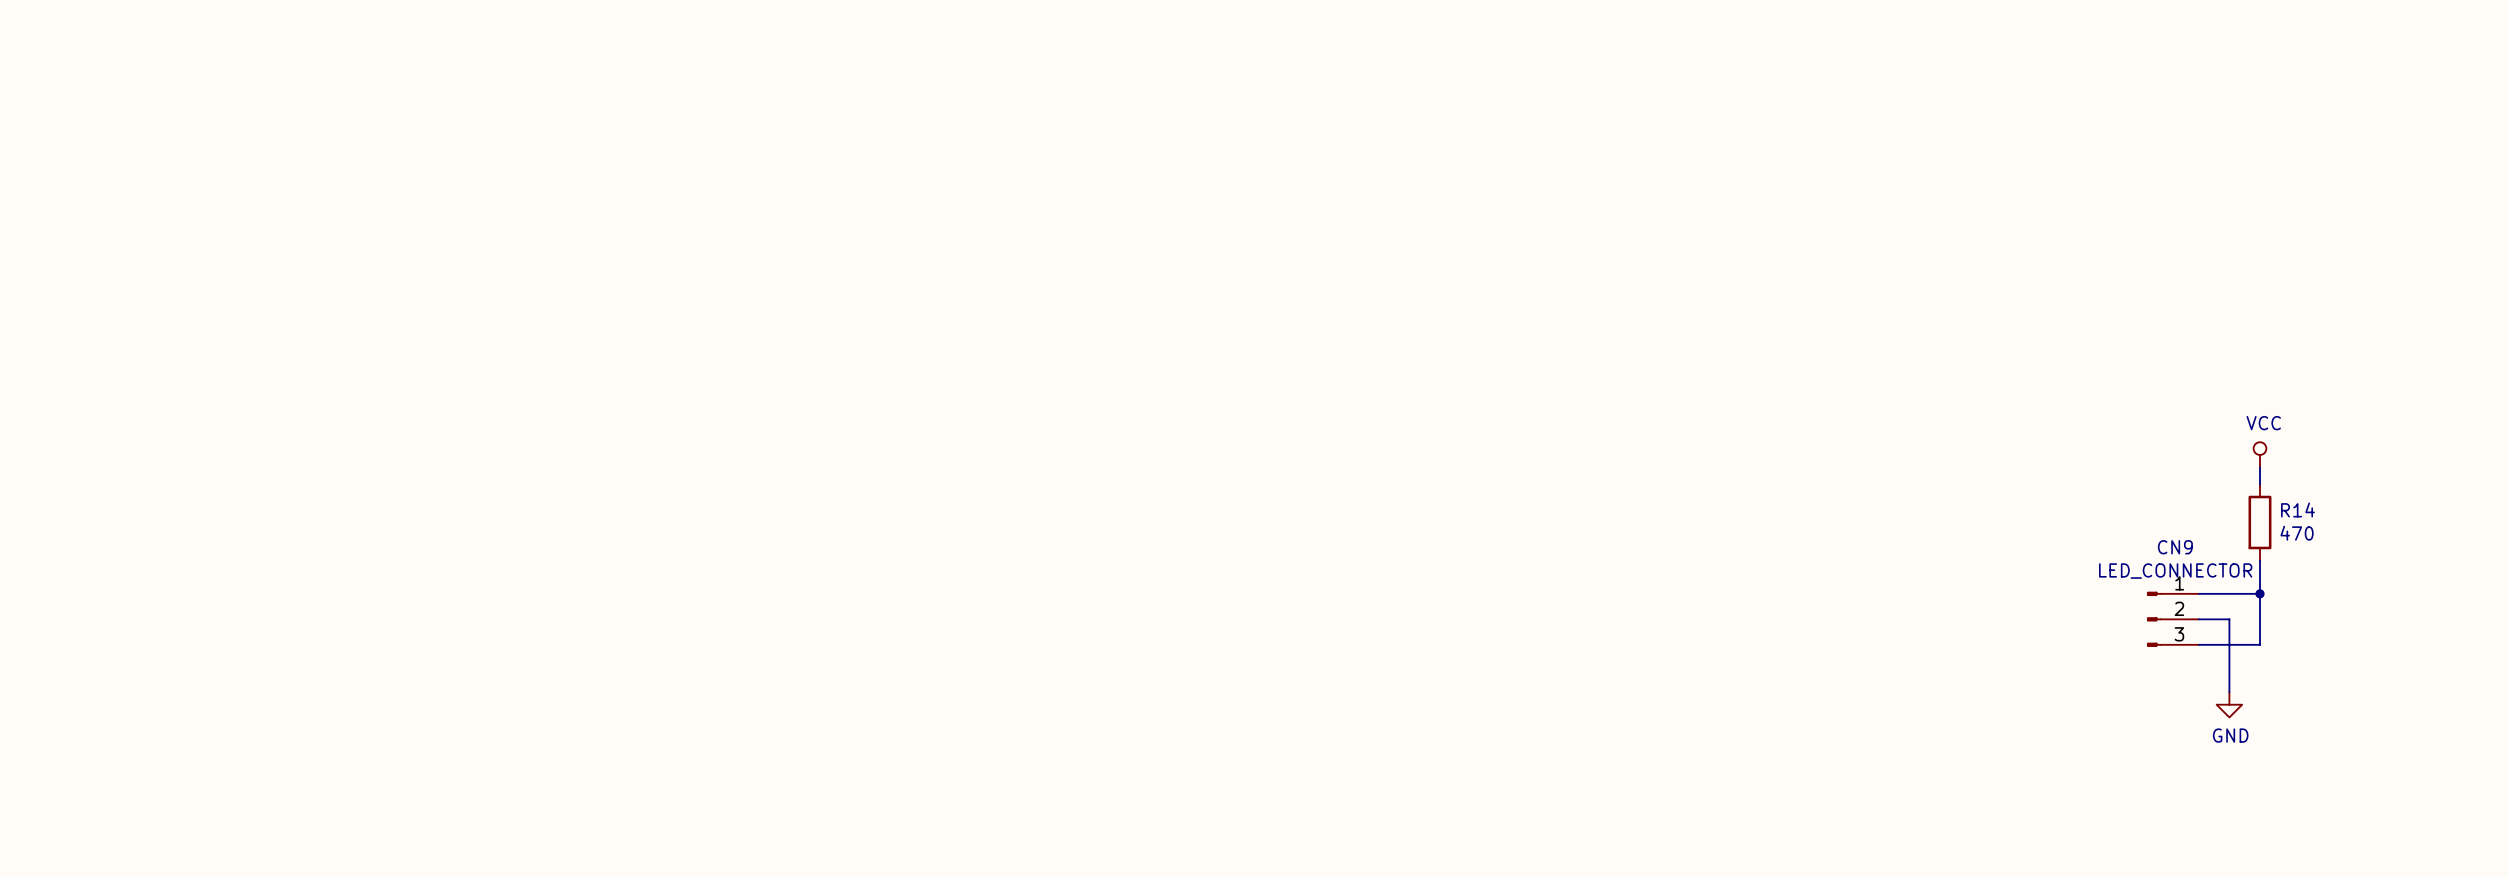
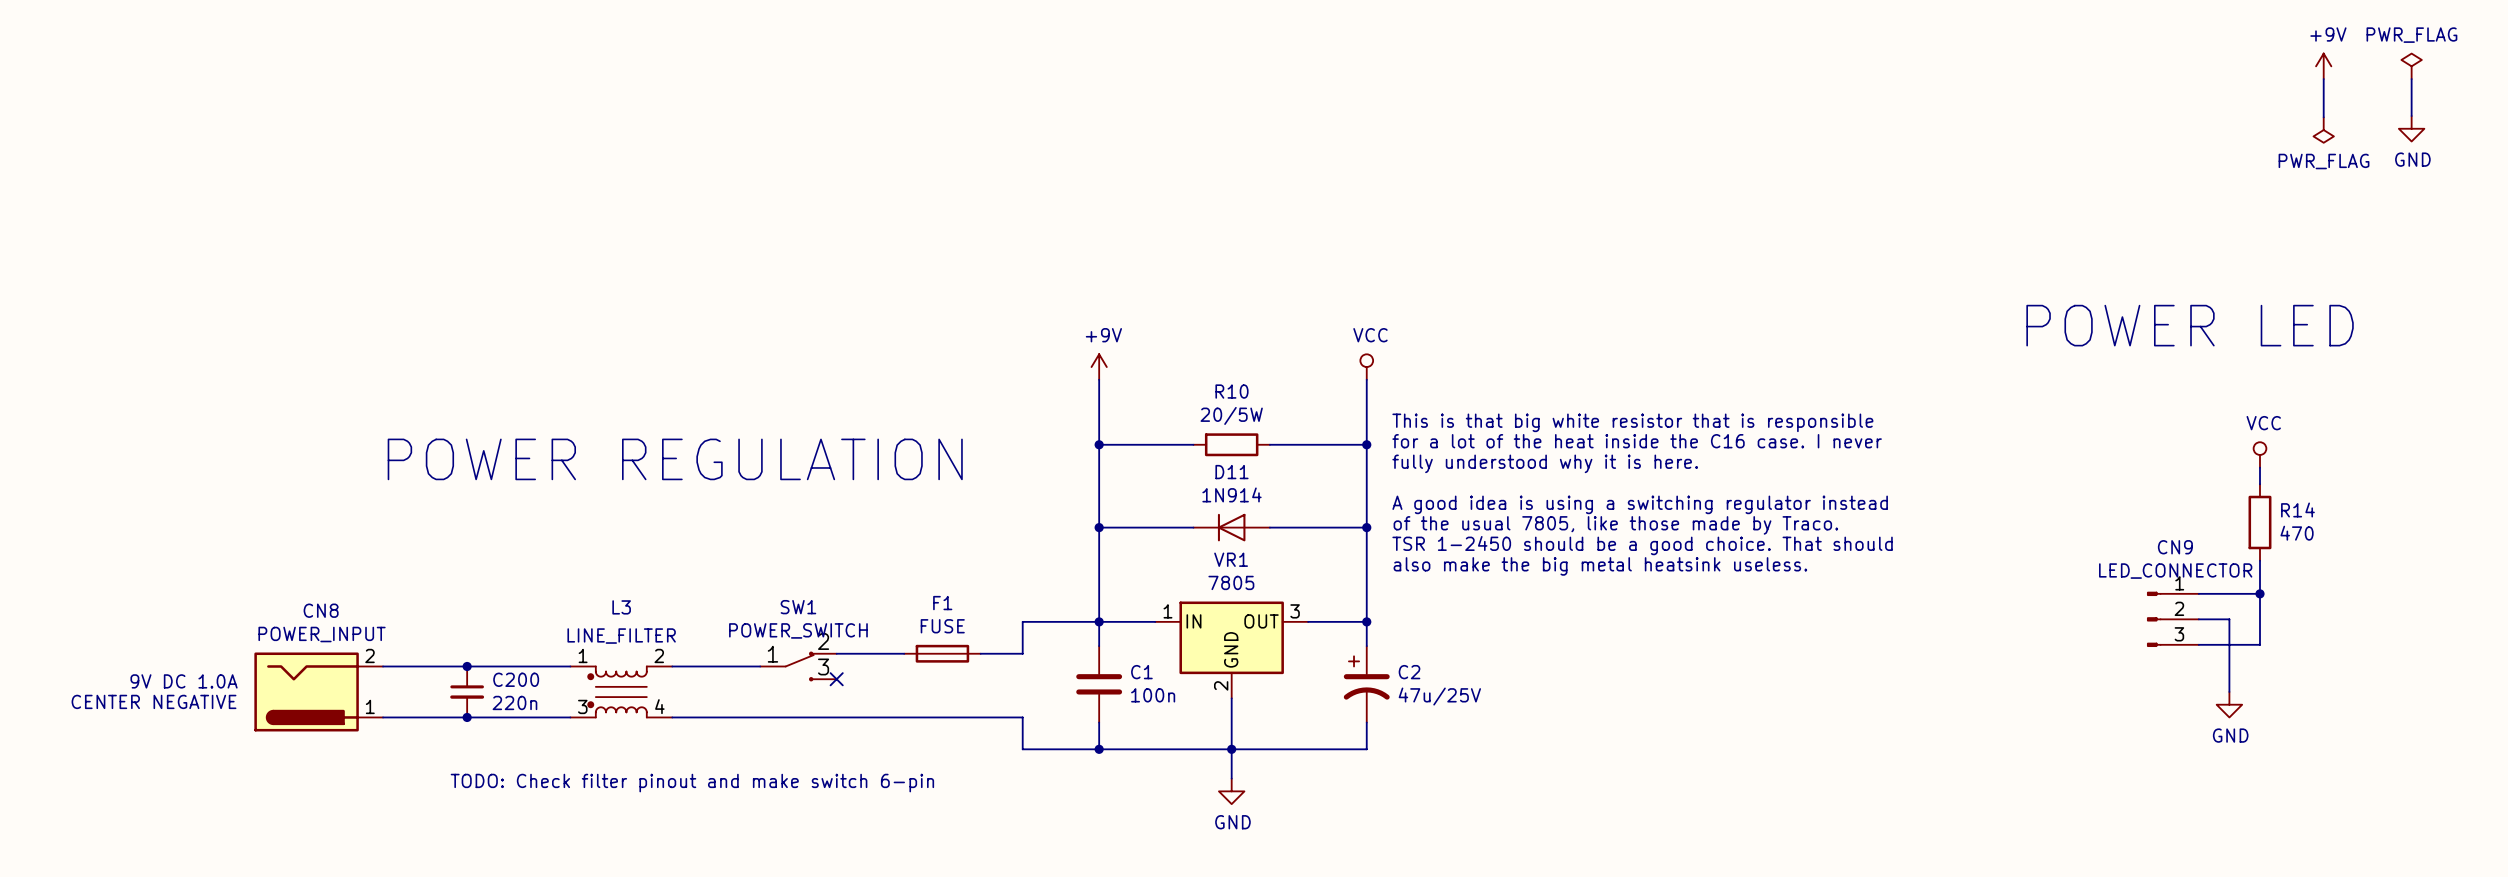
power symbol: none -> +9V (2323, 66)
power symbol: none -> PWR_FLAG (2411, 66)
wire: none -> (2323, 79) (2323, 117)
wire: none -> (2411, 79) (2411, 116)
power symbol: none -> GND (2411, 128)
power symbol: none -> PWR_FLAG (2323, 130)
text: none -> POWER LED (2190, 325)
power symbol: none -> +9V (1099, 367)
power symbol: none -> VCC (1366, 367)
wire: none -> (1099, 379) (1099, 646)
wire: none -> (1366, 379) (1366, 646)
text: none -> This is that big white resistor that is responsible (1632, 422)
text: none -> for a lot of the heat inside the C16 case. I never (1637, 441)
wire: none -> (1099, 444) (1193, 444)
junction: none -> (1099, 444)
R10: none -> 20/5W (1231, 444)
wire: none -> (1269, 444) (1366, 444)
junction: none -> (1366, 444)
text: none -> POWER REGULATION (675, 459)
text: none -> fully understood why it is here. (1545, 463)
text: none -> A good idea is using a switching regulator instead (1640, 504)
text: none -> of the usual 7805, like those made by Traco. (1615, 525)
wire: none -> (1099, 527) (1193, 527)
junction: none -> (1099, 527)
D11: none -> 1N914 (1231, 527)
wire: none -> (1269, 527) (1366, 527)
junction: none -> (1366, 527)
text: none -> TSR 1-2450 should be a good choice. That should (1642, 545)
text: none -> also make the big metal heatsink useless. (1600, 566)
junction: none -> (1099, 621)
wire: none -> (1155, 621) (1022, 621) (1022, 653) (980, 653)
wire: none -> (1308, 621) (1366, 621)
junction: none -> (1366, 621)
VR1: none -> 7805 (1231, 649)
wire: none -> (836, 653) (904, 653)
F1: none -> FUSE (942, 653)
wire: none -> (383, 666) (570, 666)
junction: none -> (467, 666)
wire: none -> (672, 666) (760, 666)
SW1: none -> POWER_SWITCH (798, 666)
no-connect mark: none -> (836, 679)
text: none -> 9V DC 1.0A (184, 681)
C1: none -> 100n (1099, 684)
C2: none -> 47u/25V (1366, 684)
CN8: none -> POWER_INPUT (318, 691)
C200: none -> 220n (467, 691)
L3: none -> LINE_FILTER (621, 691)
wire: none -> (1231, 698) (1231, 778)
text: none -> CENTER NEGATIVE (154, 701)
wire: none -> (383, 717) (570, 717)
junction: none -> (467, 717)
wire: none -> (672, 717) (1022, 717) (1022, 749) (1366, 749) (1366, 722)
wire: none -> (1099, 722) (1099, 749)
junction: none -> (1099, 749)
junction: none -> (1231, 749)
text: none -> TODO: Check filter pinout and make switch 6-pin (692, 783)
power symbol: none -> GND (1231, 791)

